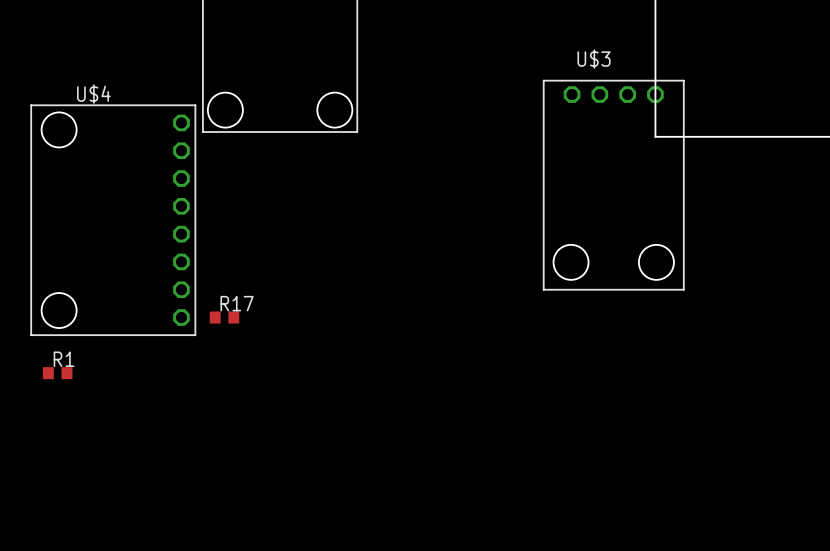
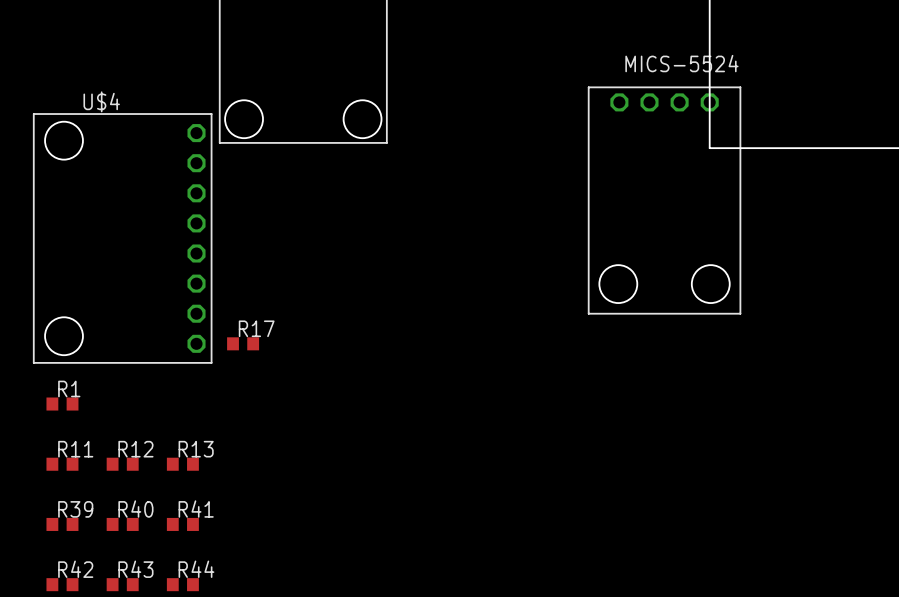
U$3 name: U$3 (594, 59) -> MICS-5524 (681, 63)
R11: none -> (62, 464)
R12: none -> (122, 464)
R13: none -> (182, 464)
R39: none -> (62, 524)
R40: none -> (122, 524)
R41: none -> (182, 524)
R42: none -> (62, 584)
R43: none -> (122, 584)
R44: none -> (182, 584)

